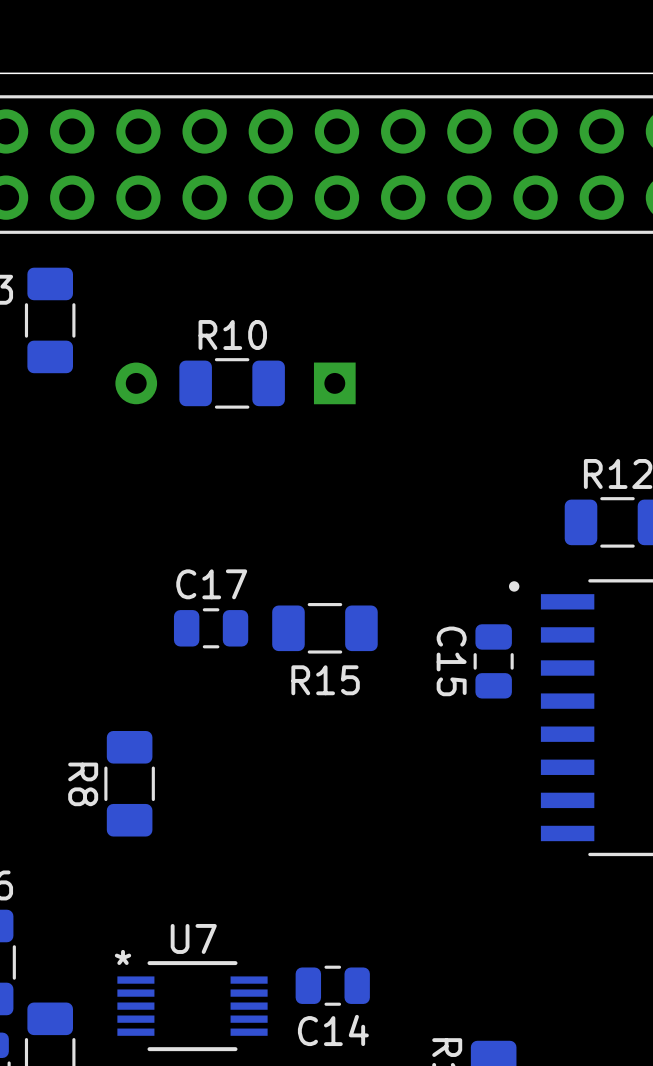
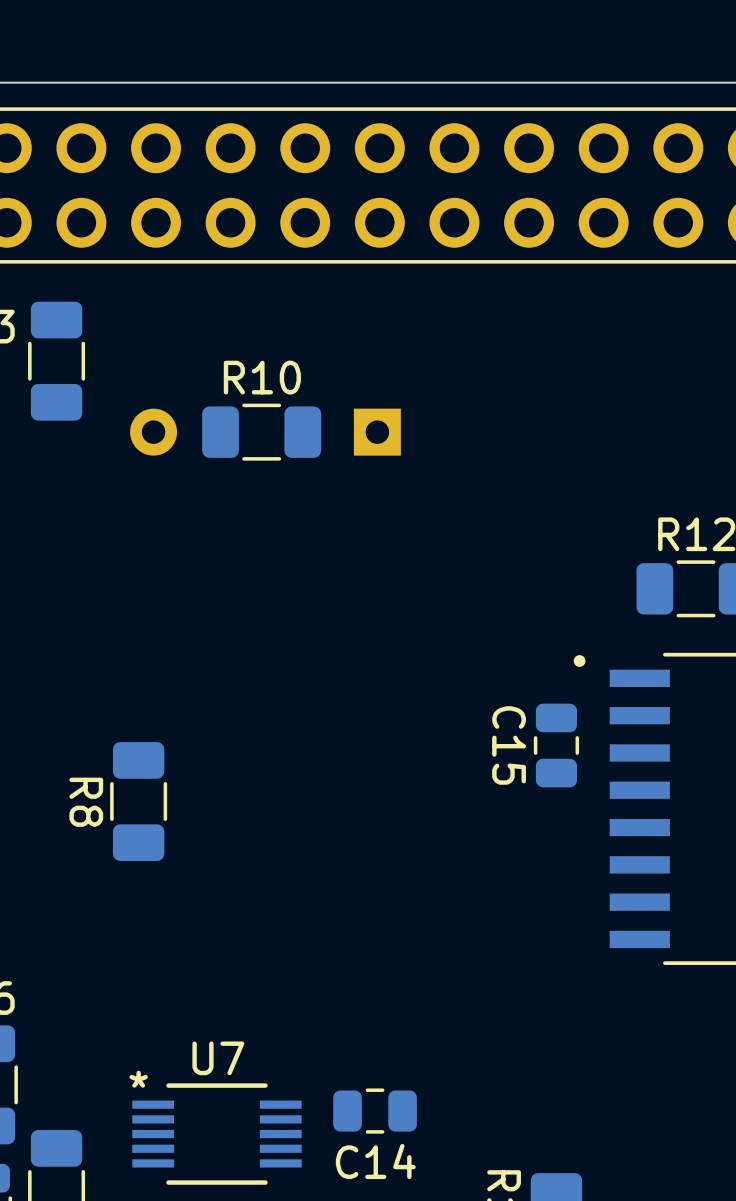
C17: (211, 628) -> none
R15: (324, 628) -> none
R8 position: (129, 783) -> (138, 801)

